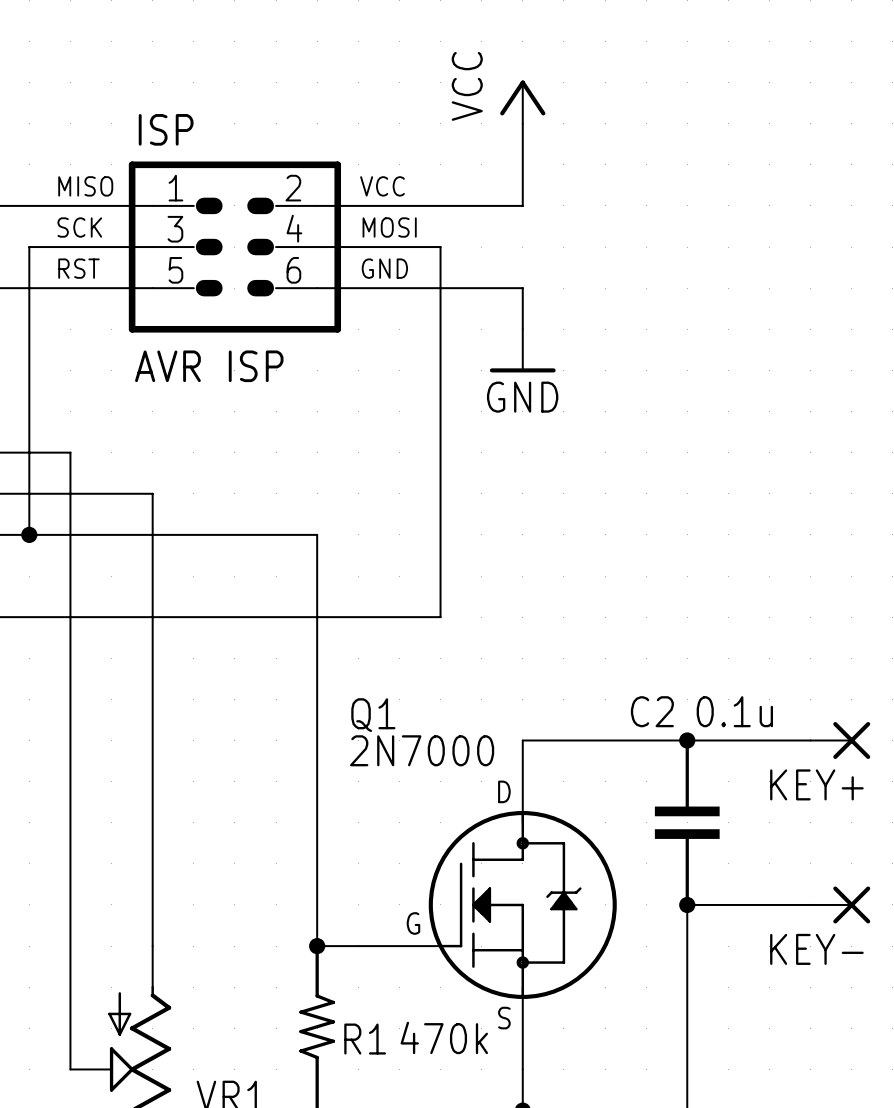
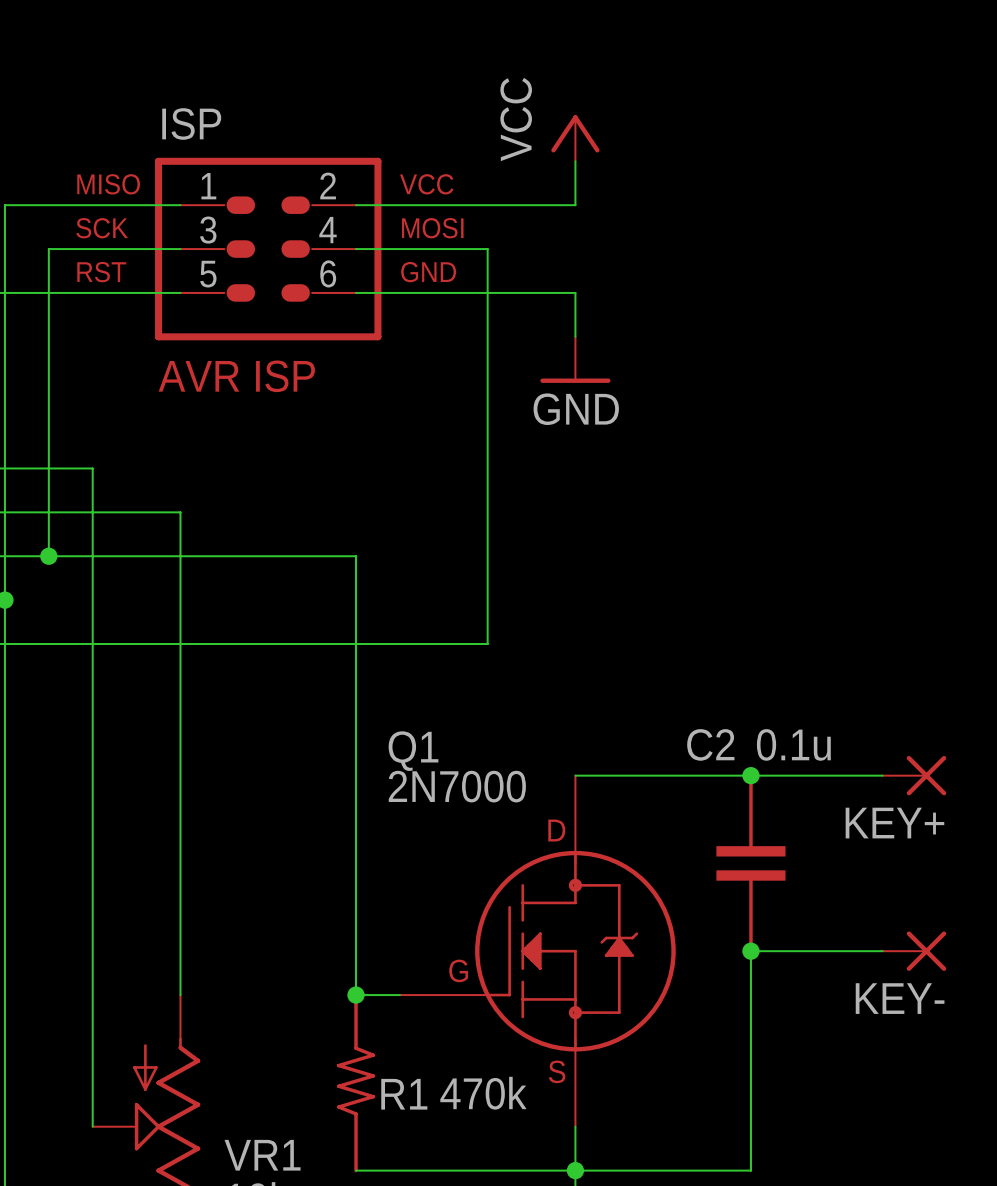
power symbol position: VCC (522, 102) -> VCC (575, 138)

